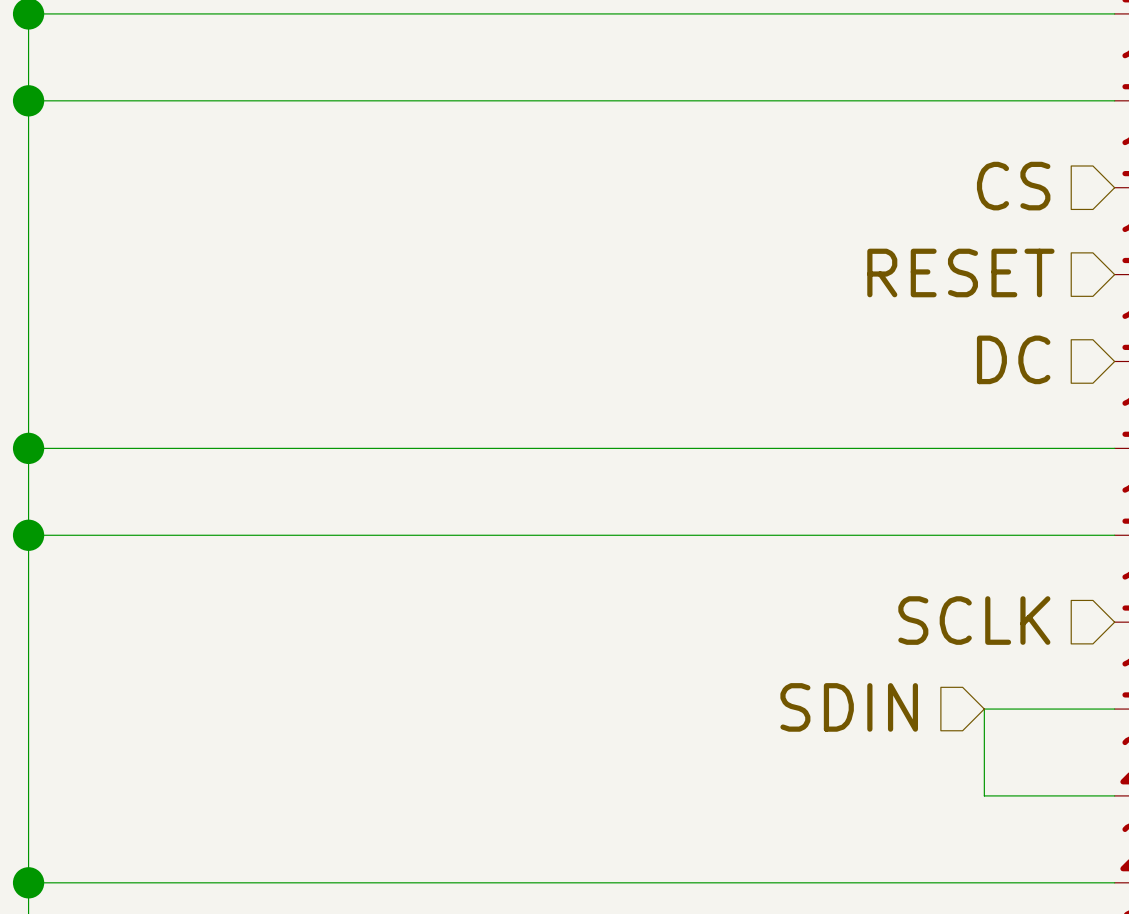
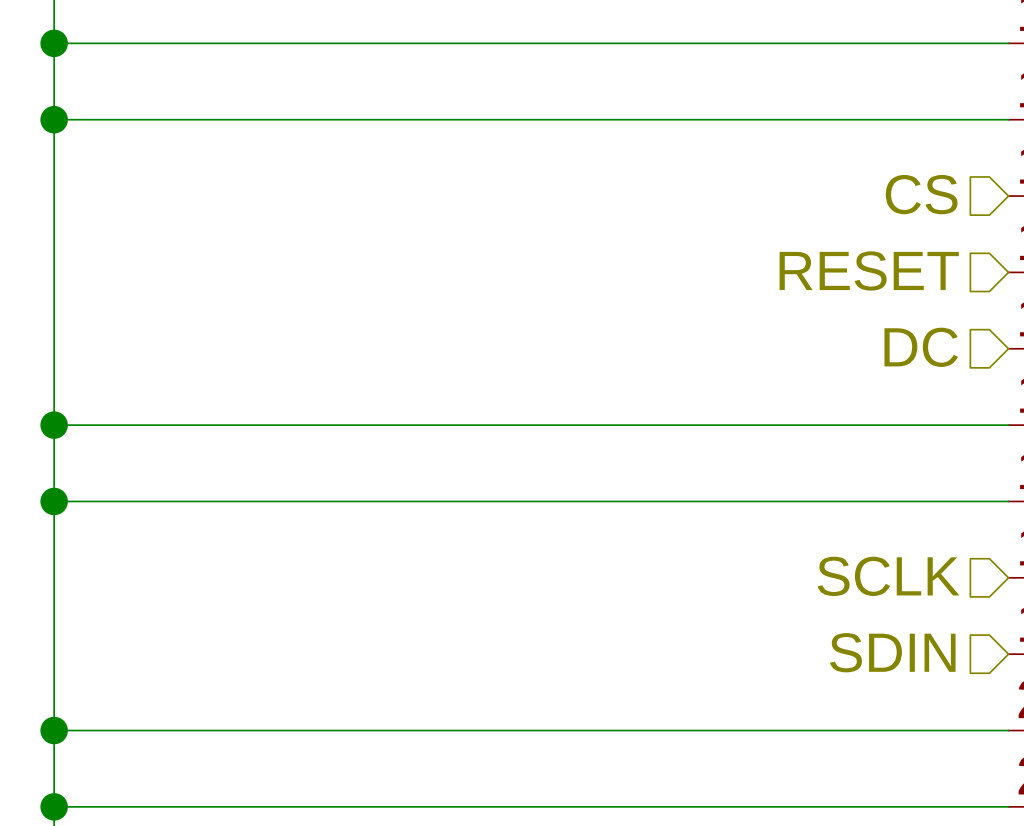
hierarchical label position: SDIN (849, 707) -> SDIN (892, 652)
wire: (1114, 709) (984, 709) (984, 795) -> (54, 730) (894, 730)
junction: none -> (54, 730)

